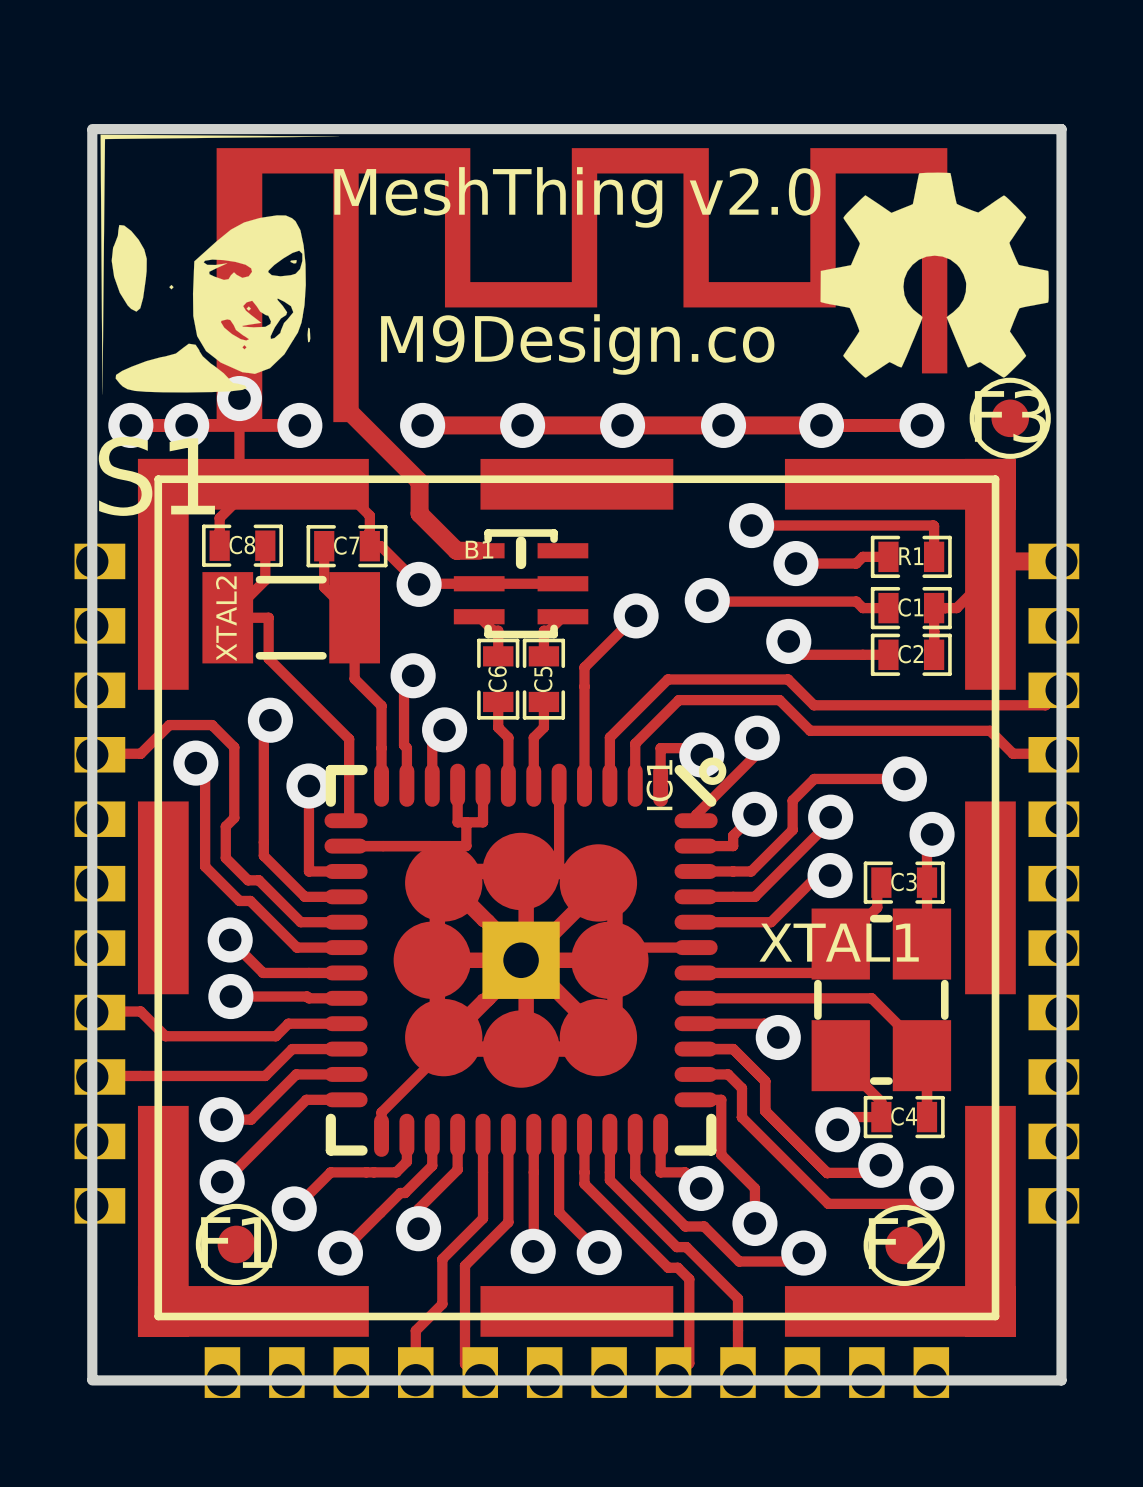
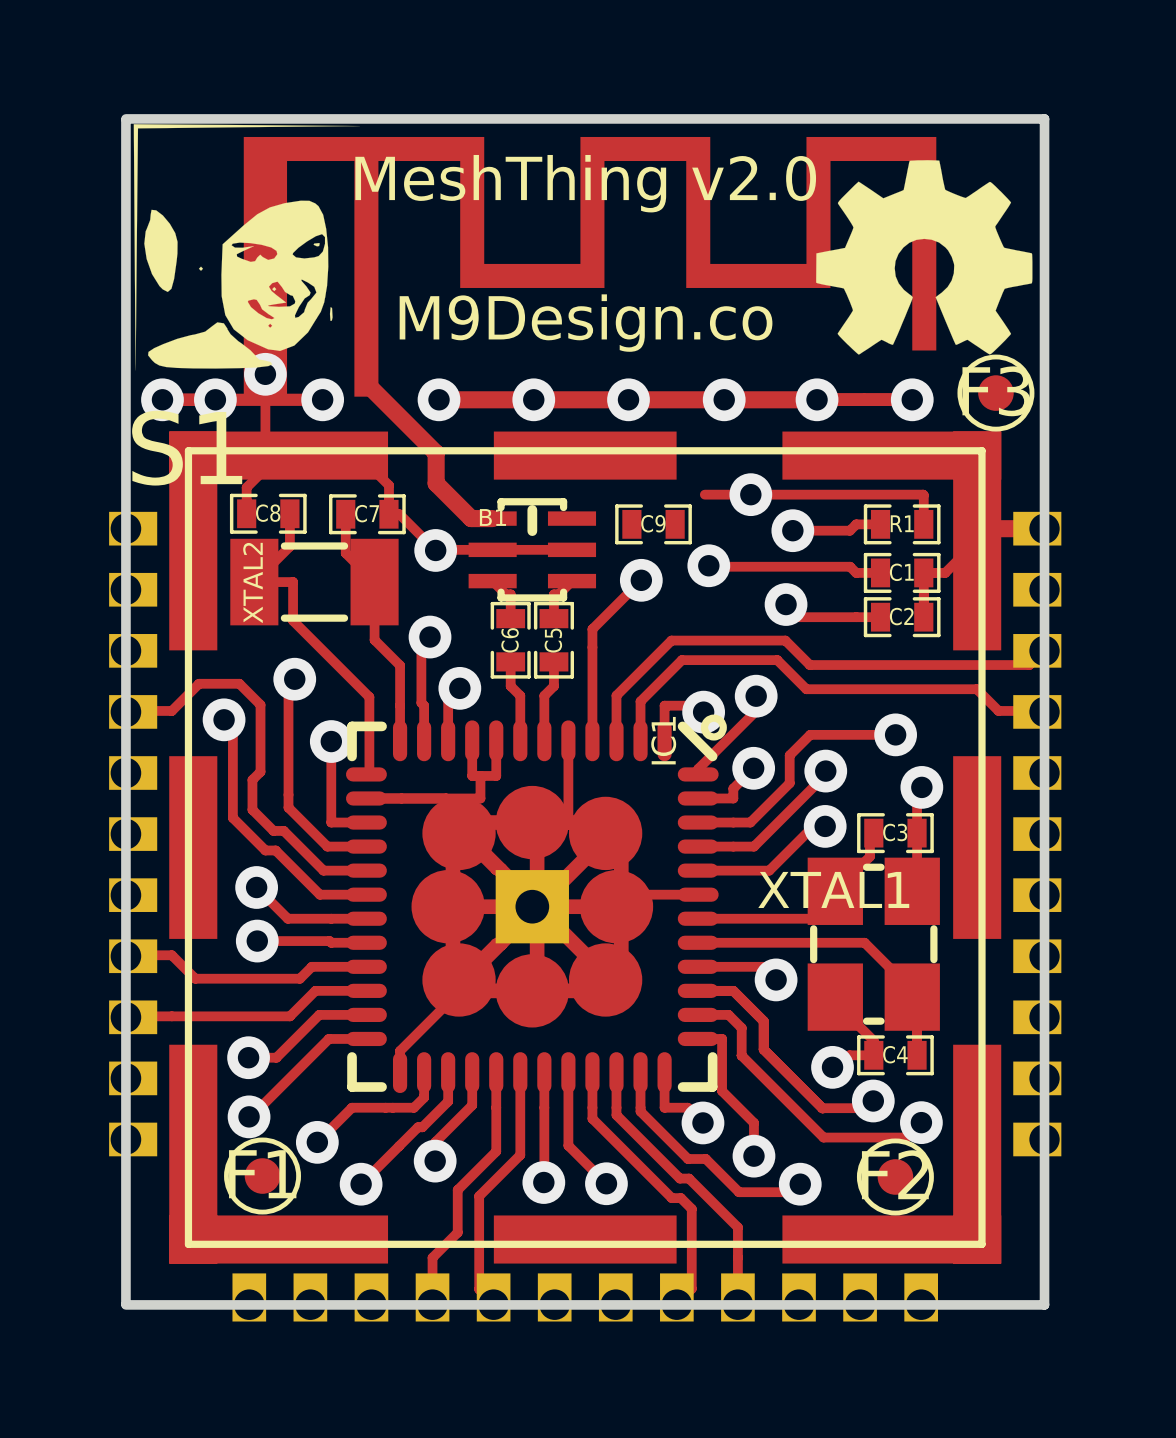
track: (751, 525) (933, 525) -> (704, 494) (923, 494)
C9: none -> (653, 524)

